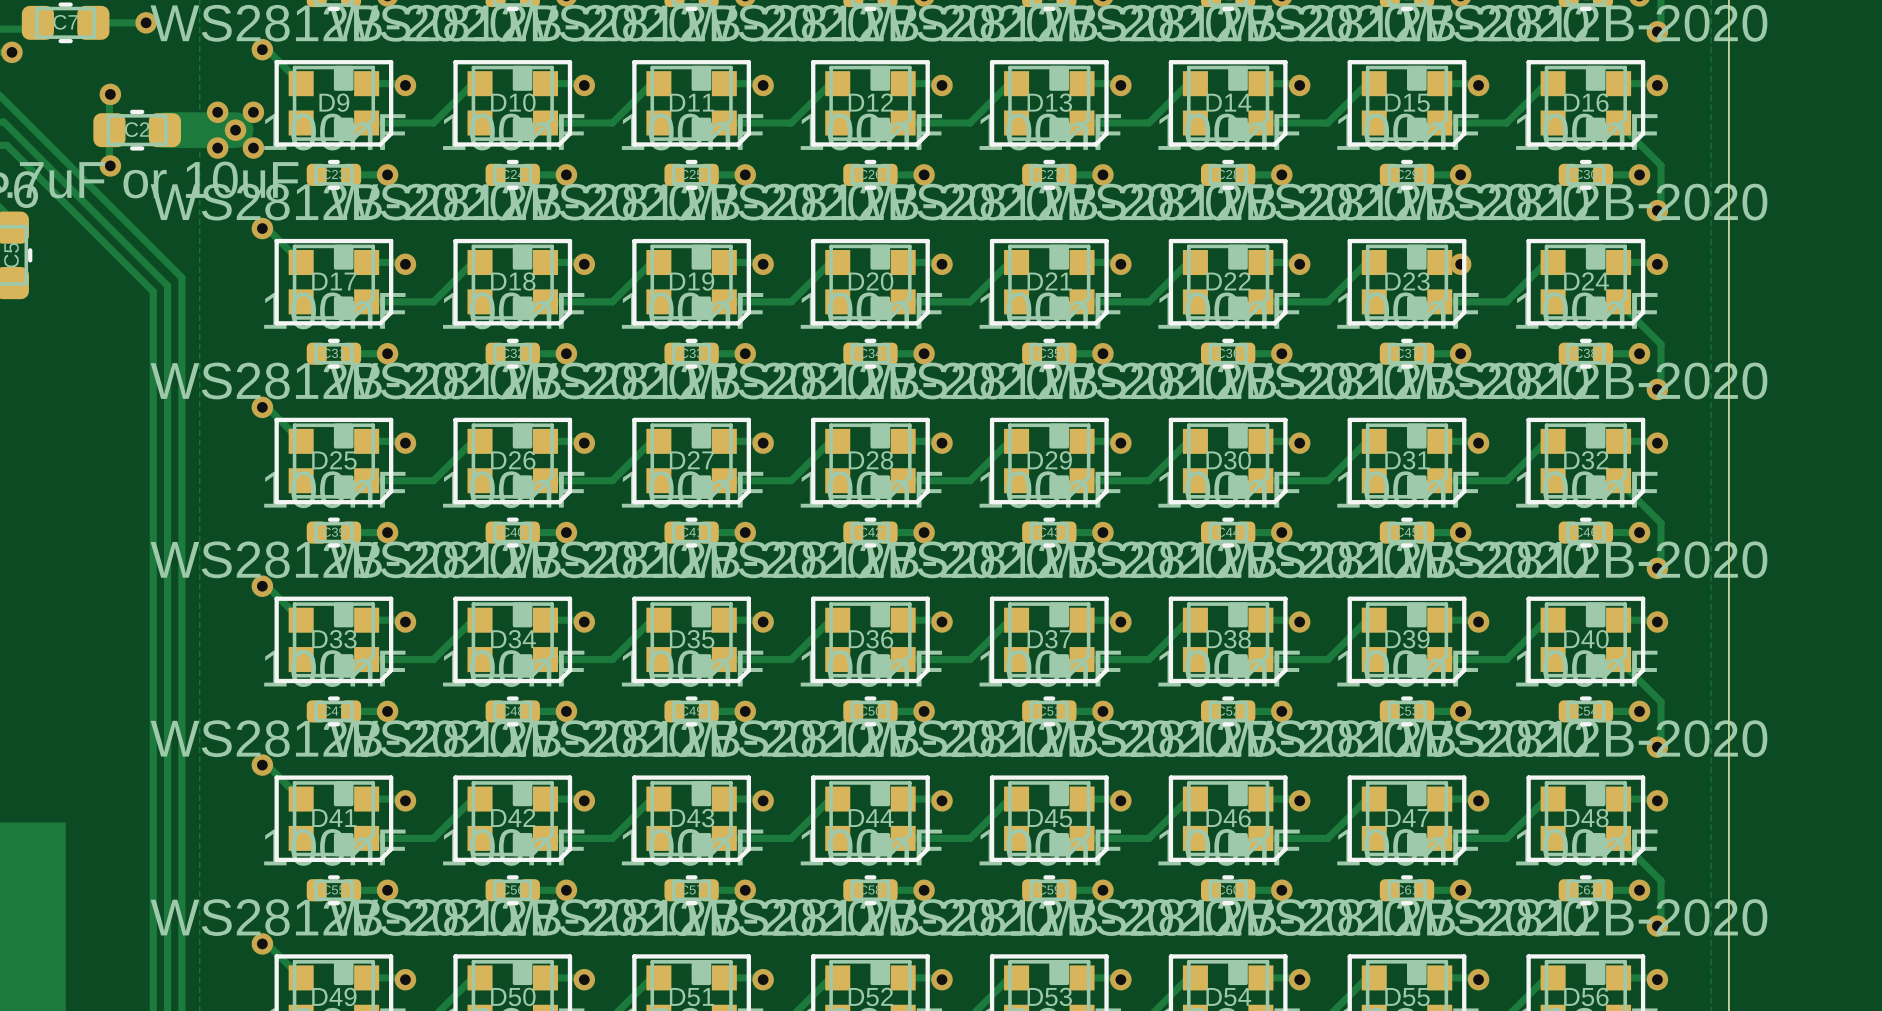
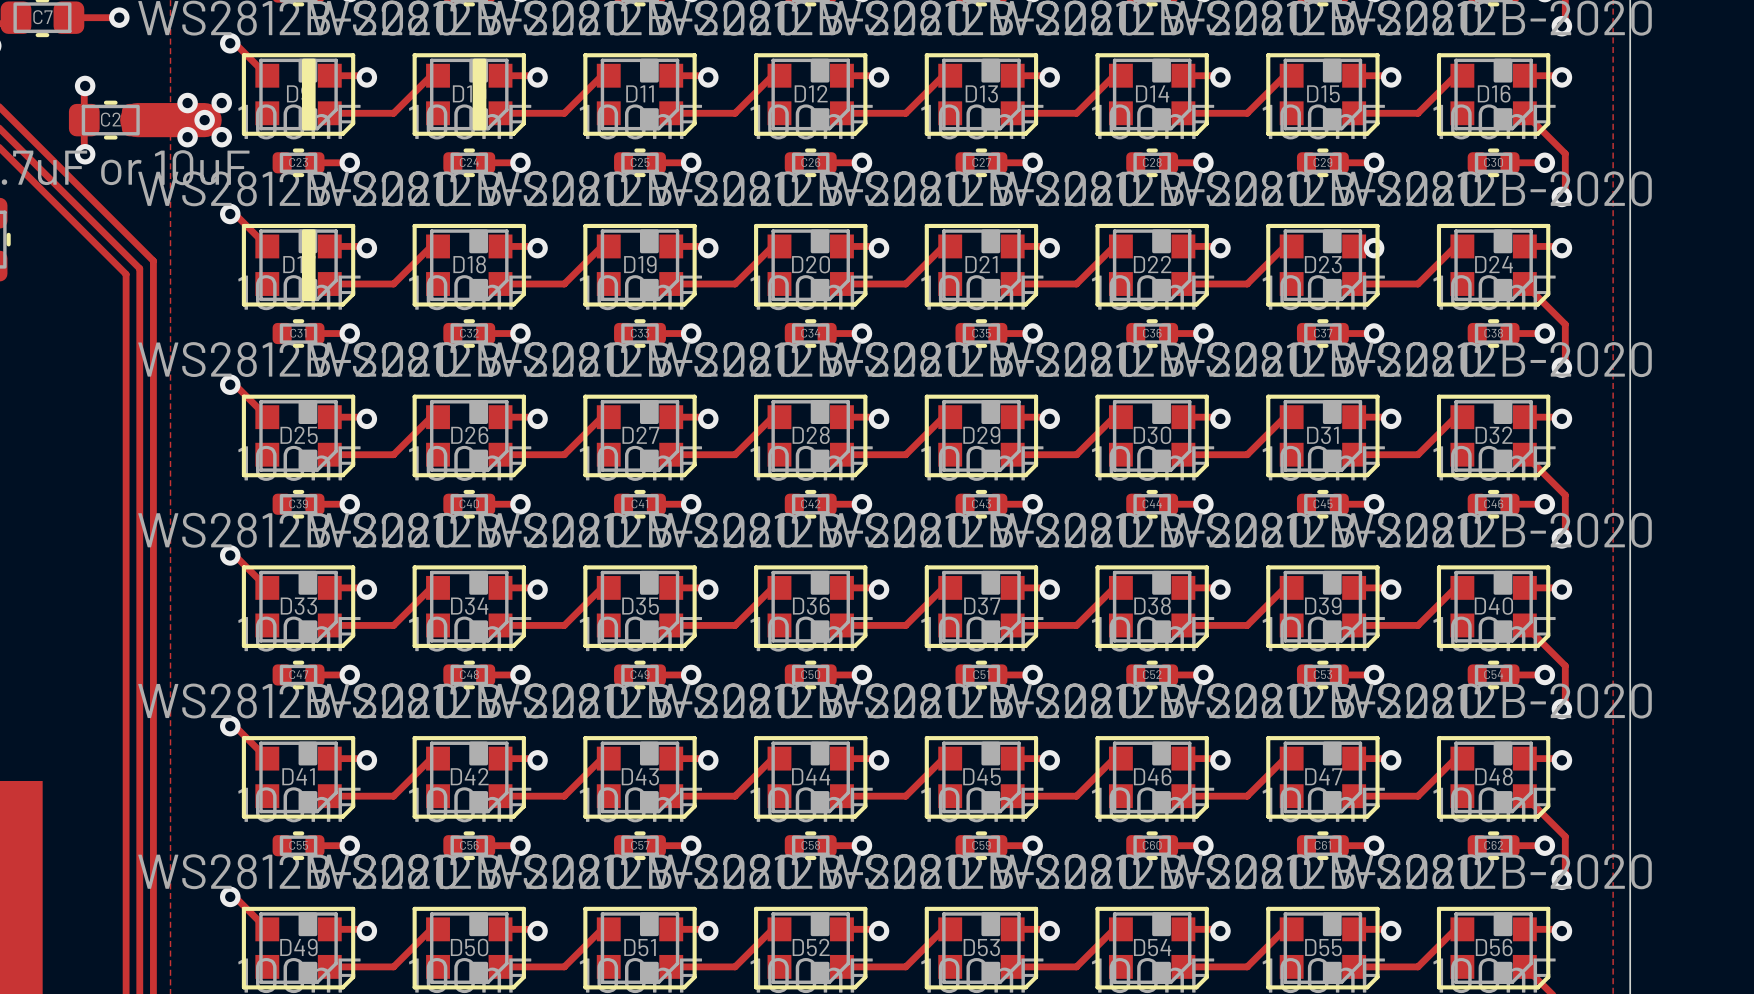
drawing: none -> [301, 58, 316, 131]
drawing: none -> [472, 58, 487, 131]
drawing: none -> [301, 229, 316, 302]

